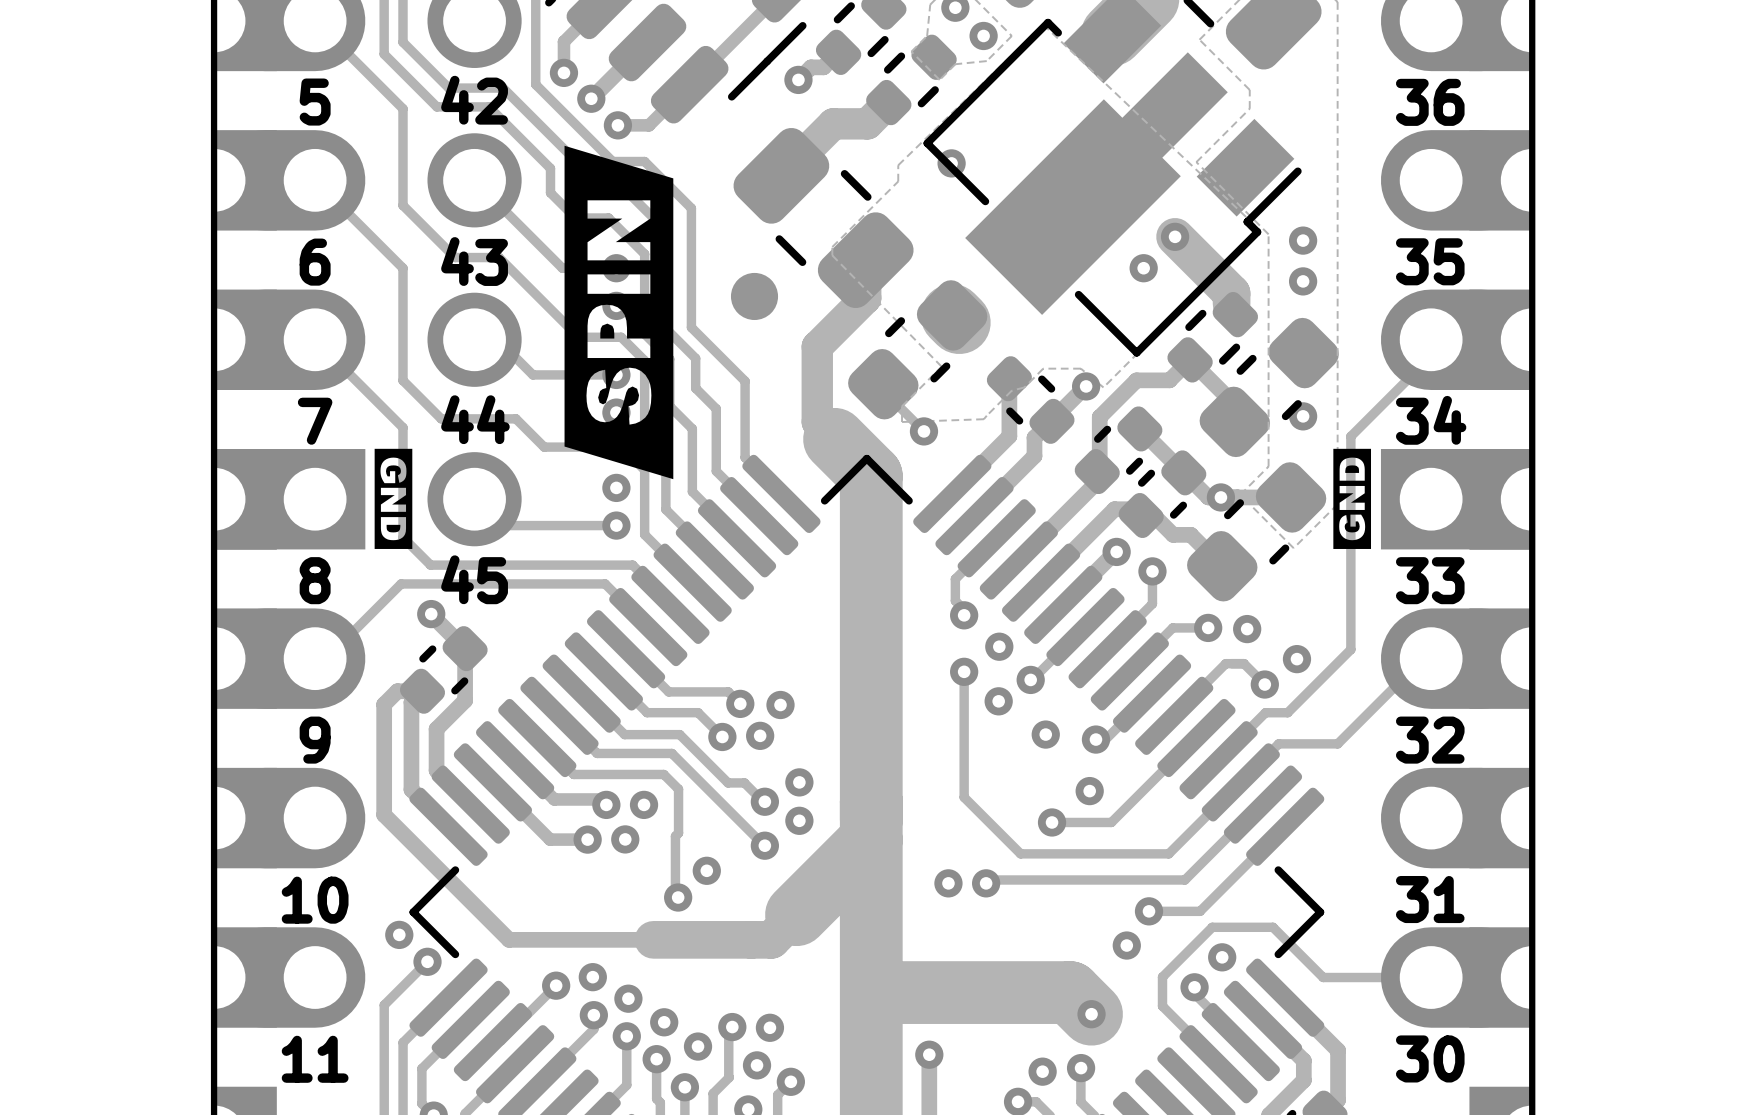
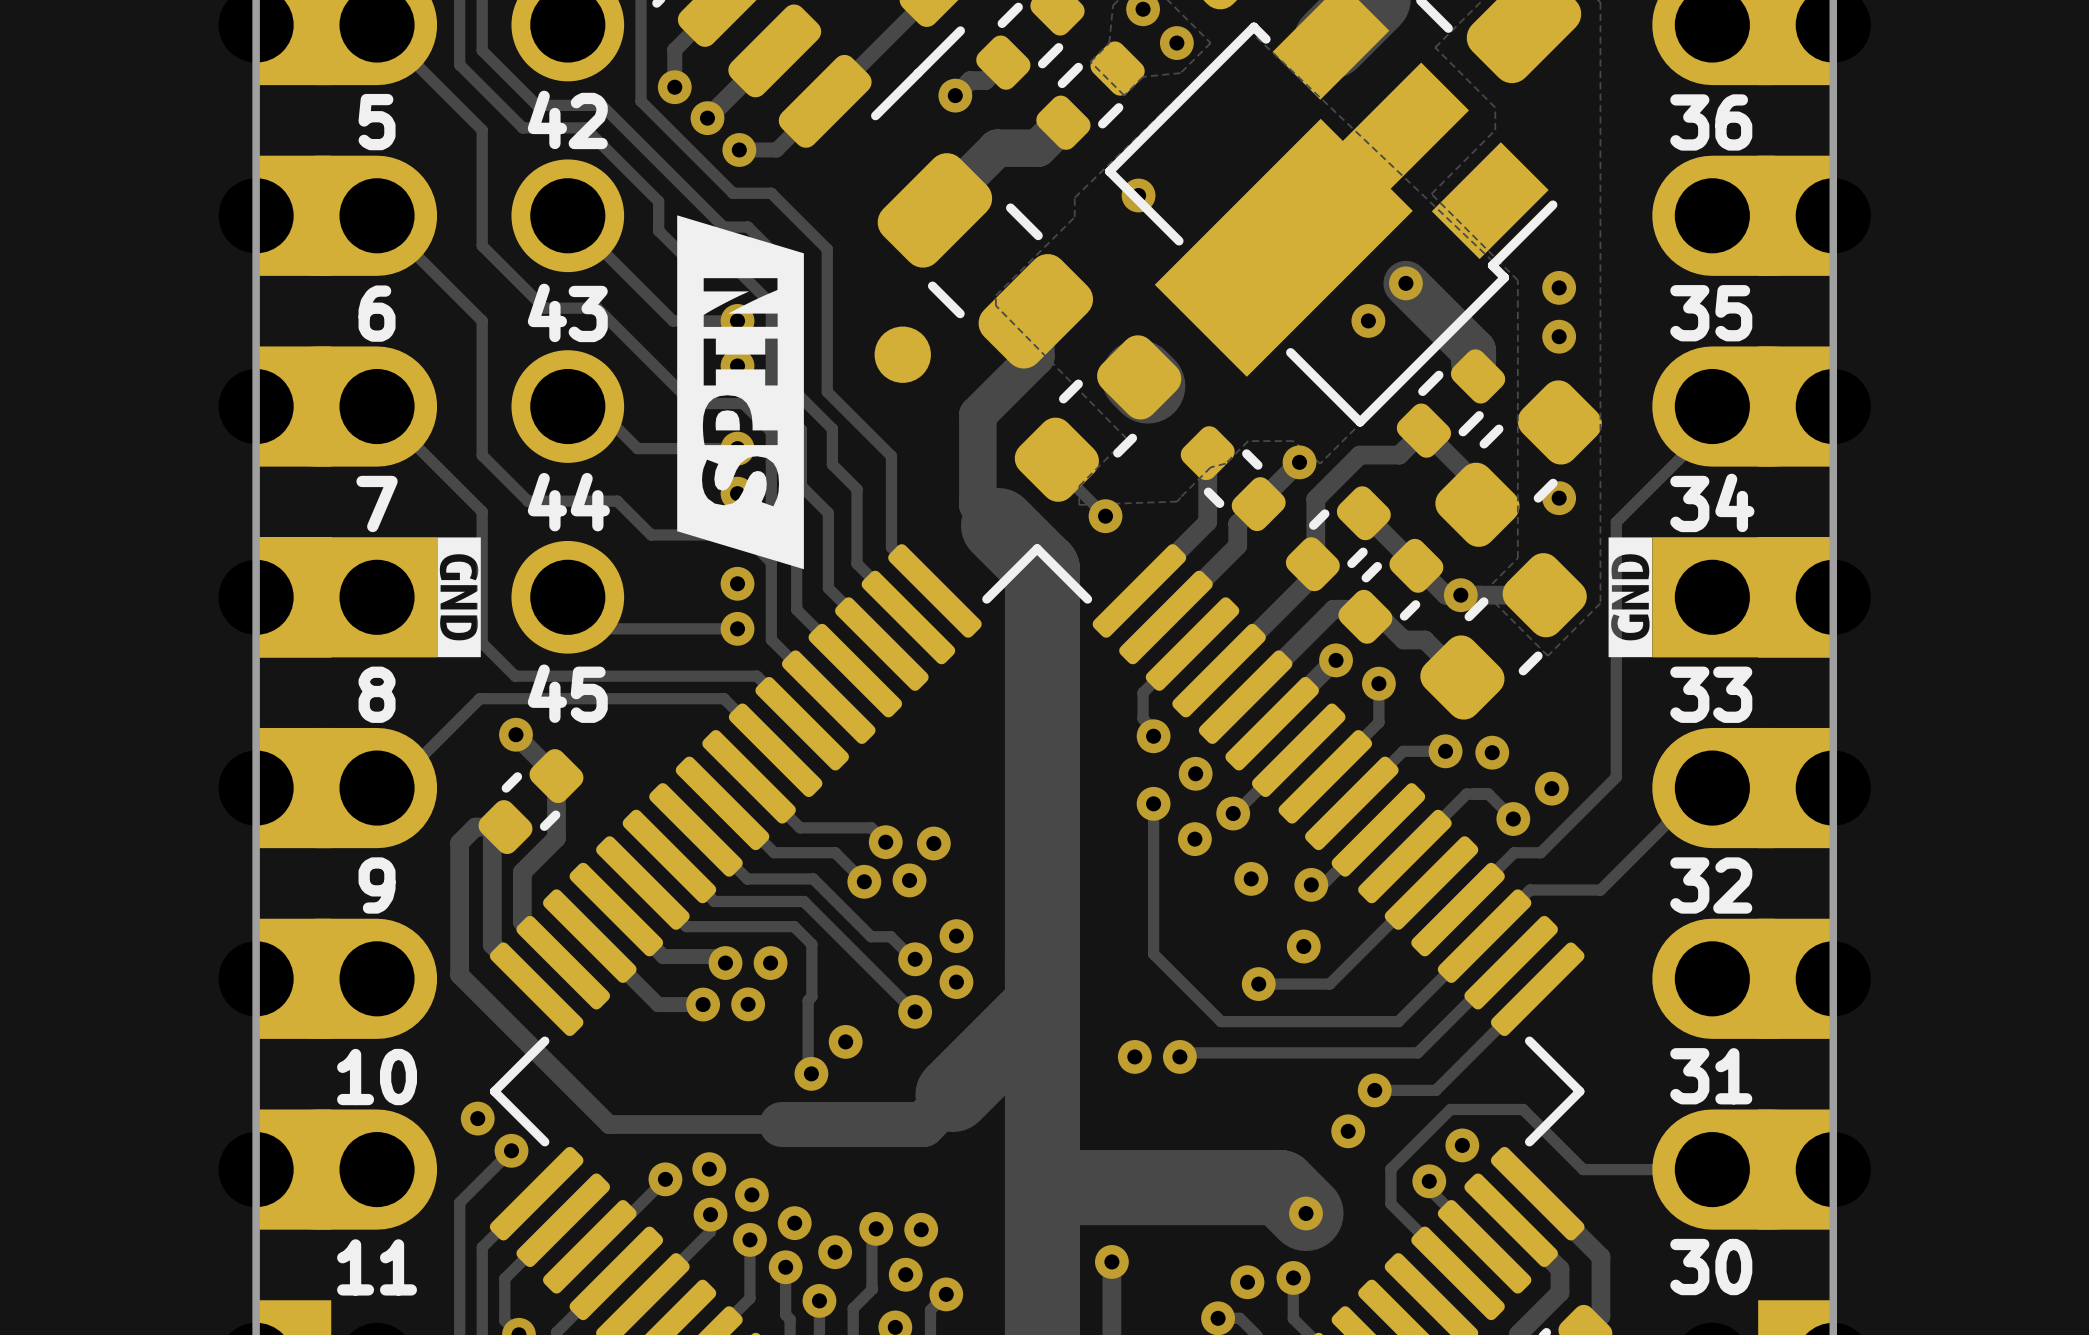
drawing shape: [564, 145, 674, 480] -> [677, 215, 804, 570]
drawing shape: [374, 448, 413, 549] -> [437, 537, 481, 658]
drawing shape: [1333, 448, 1372, 549] -> [1608, 537, 1653, 658]

